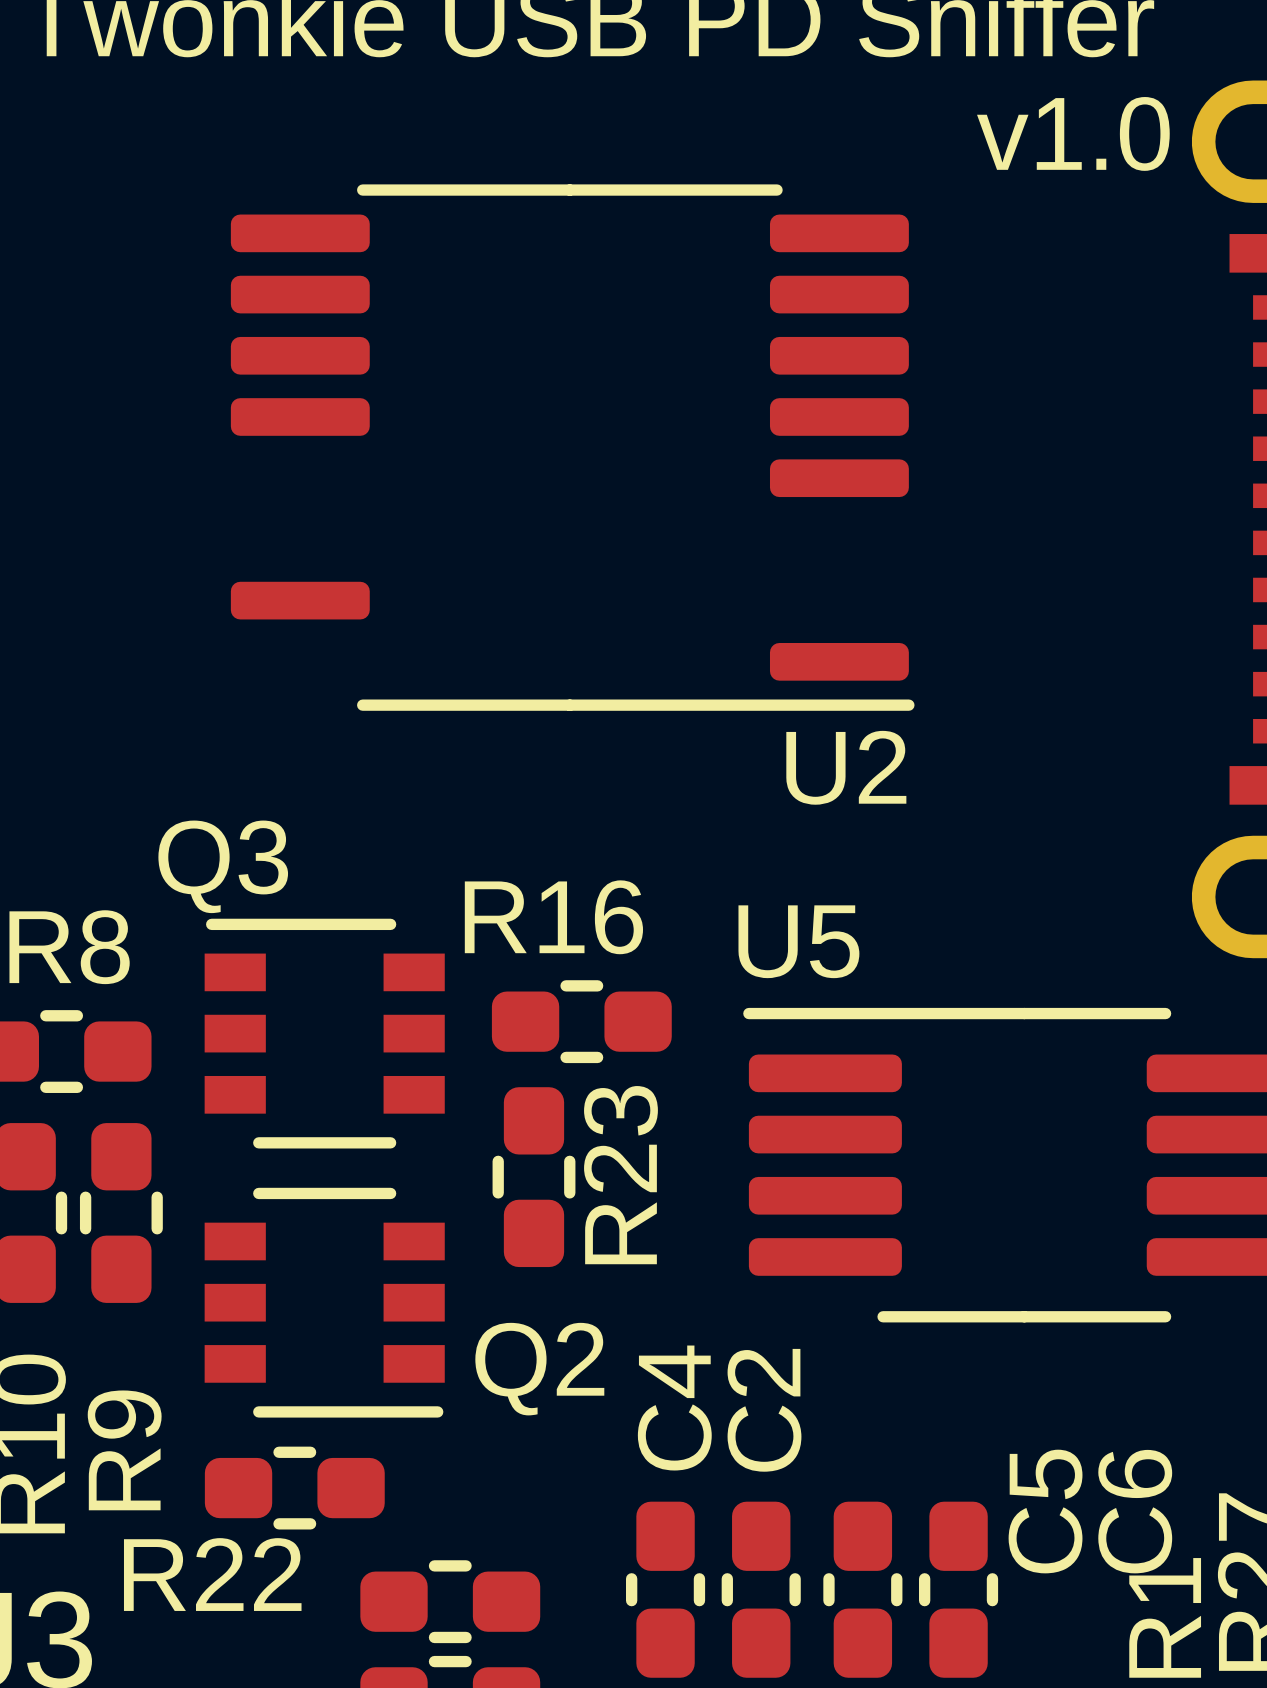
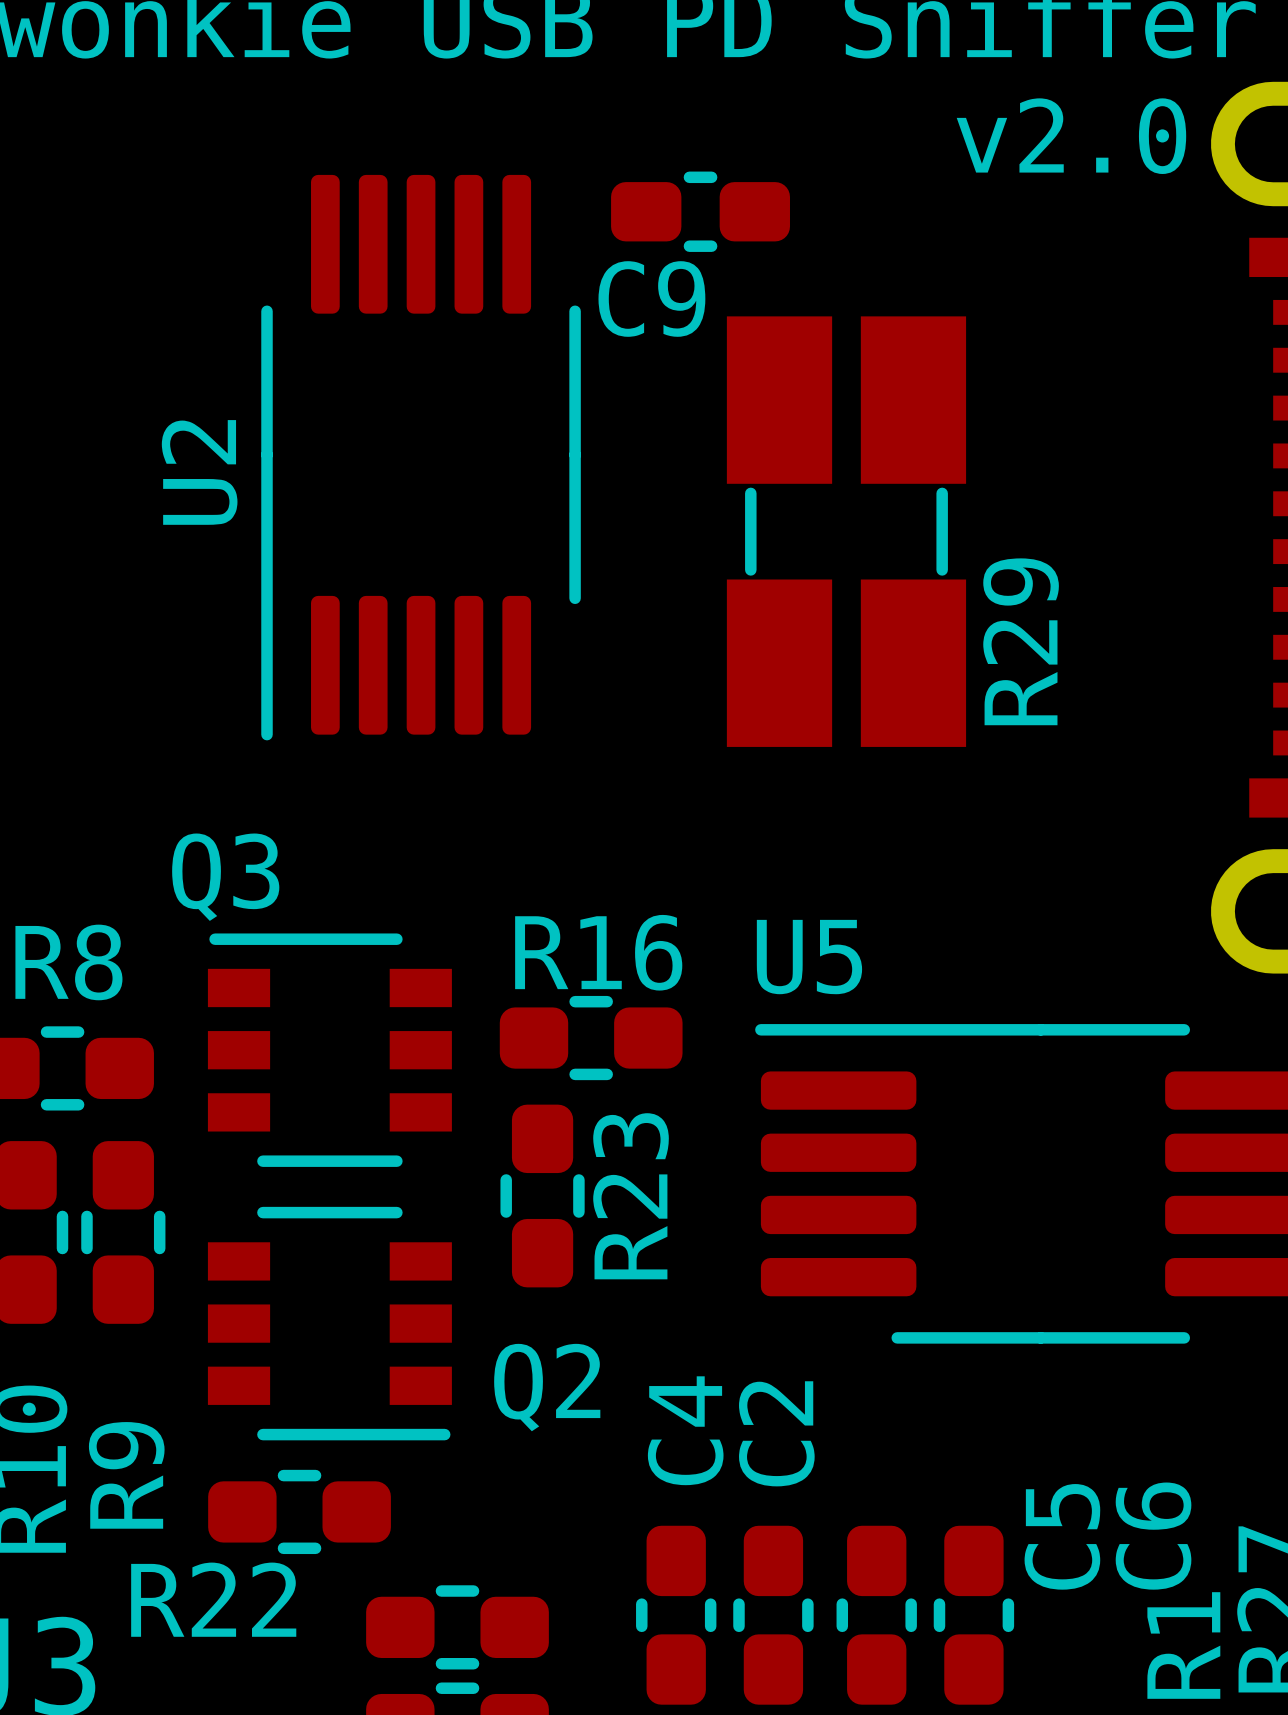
text: v1.0 (1073, 133) -> v2.0 (1071, 136)
U2 footprint: [230, 184, 915, 711] -> [261, 174, 581, 741]
C9: none -> (700, 211)
R29: none -> (846, 531)
U2 name position: U2 (846, 767) -> U2 (199, 472)
R16 name position: R16 (553, 917) -> R16 (598, 952)

